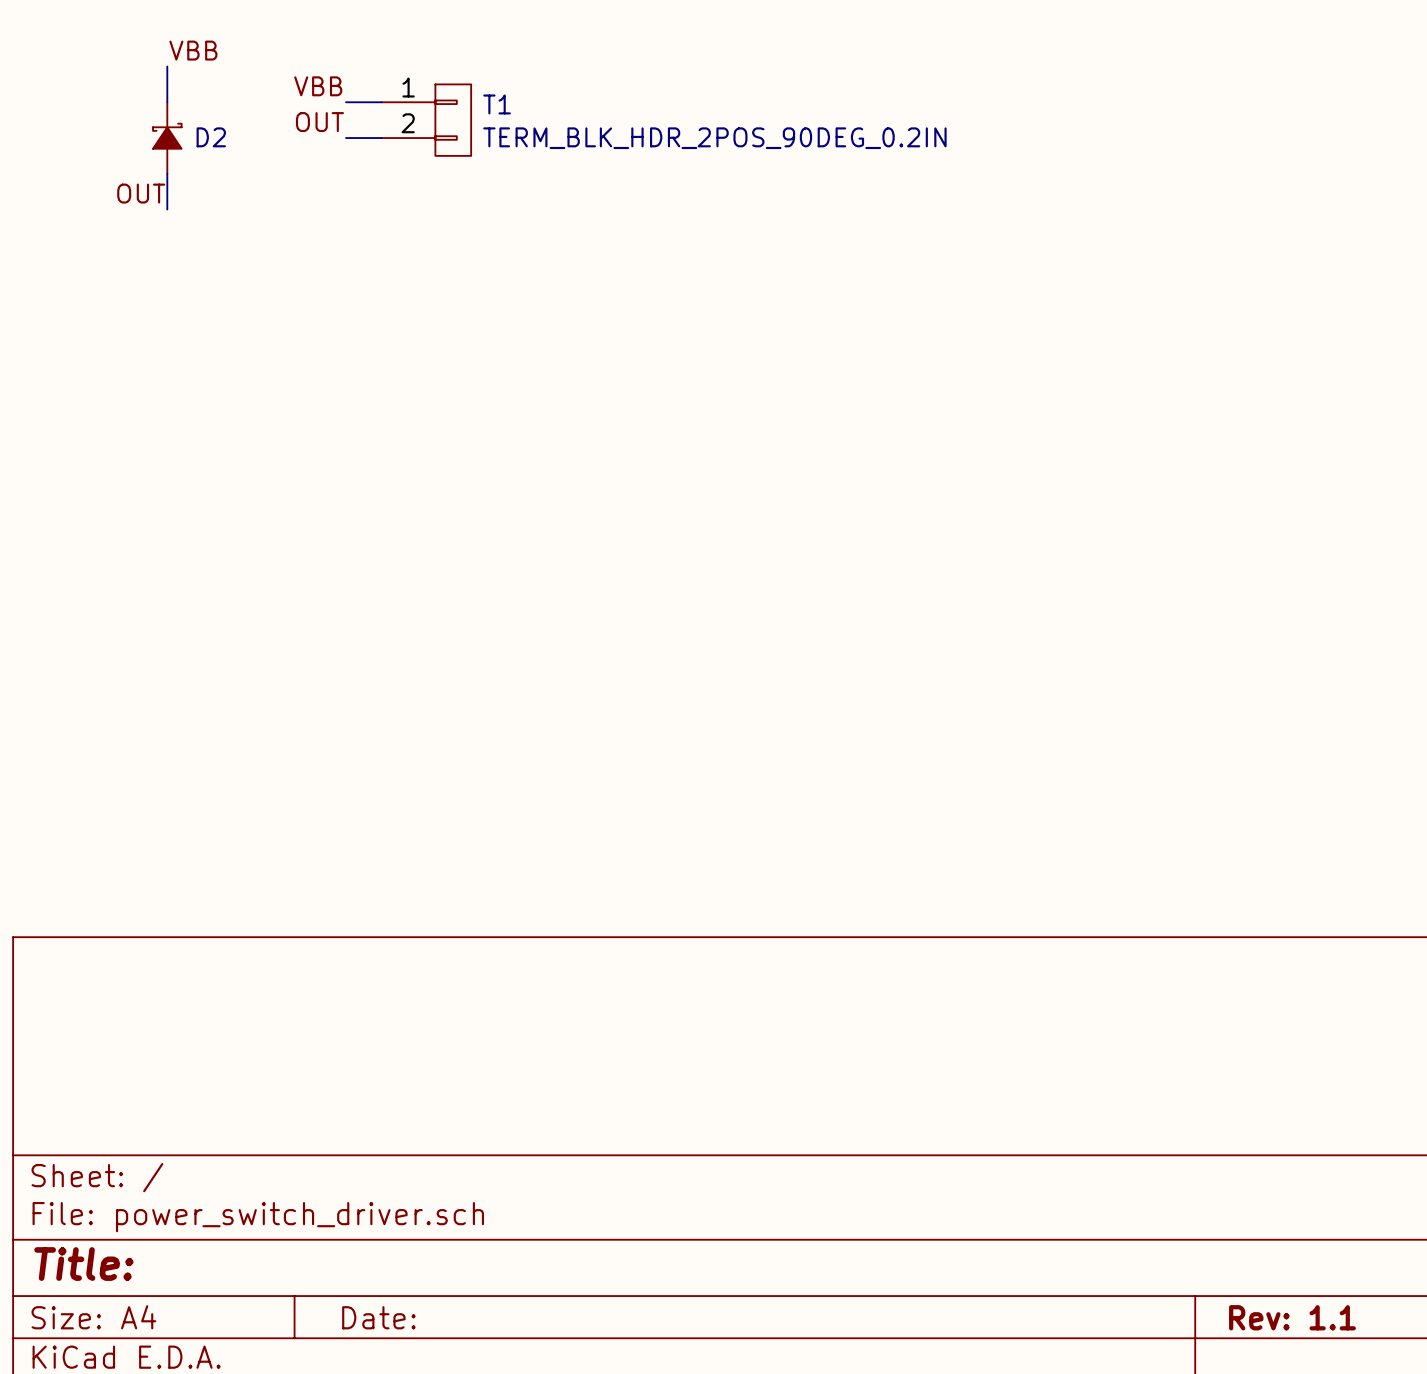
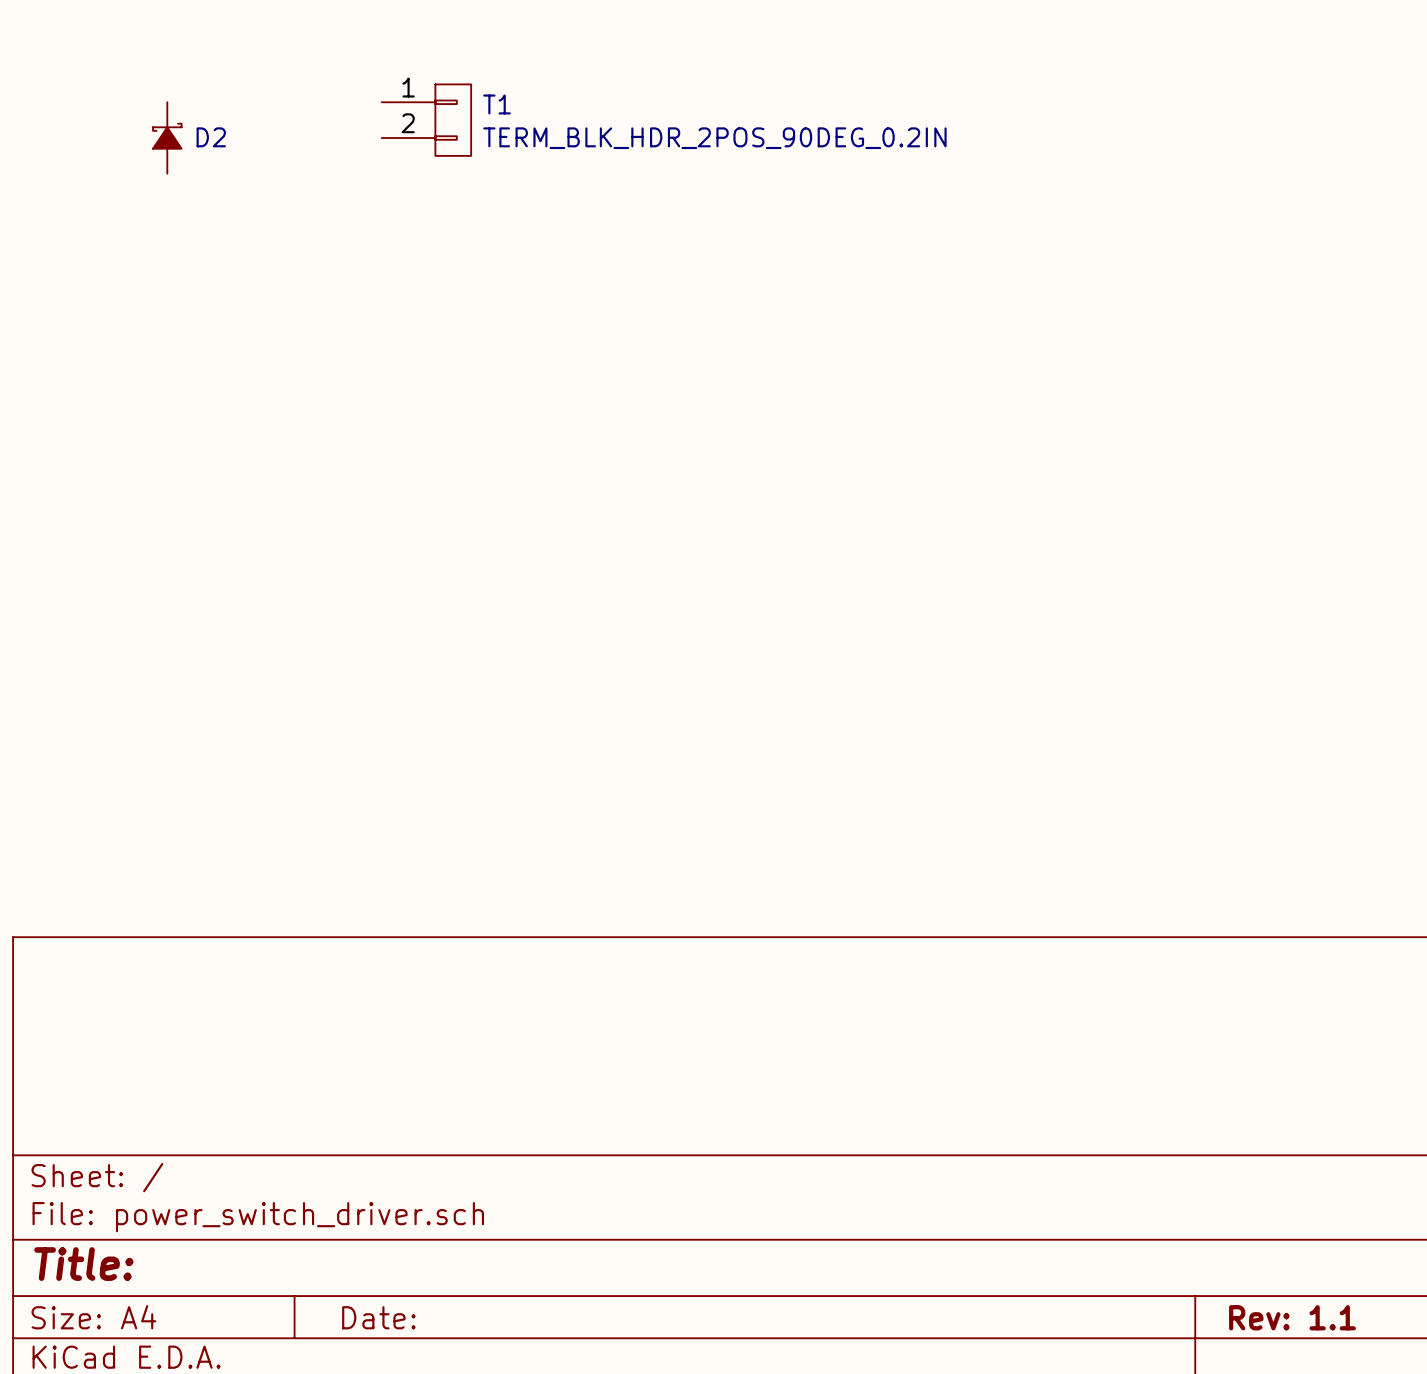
label: VBB (193, 50) -> none
wire: (167, 66) (167, 102) -> none
label: VBB (318, 86) -> none
wire: (346, 102) (381, 102) -> none
label: OUT (319, 122) -> none
wire: (346, 138) (381, 138) -> none
wire: (167, 173) (167, 209) -> none
label: OUT (141, 193) -> none

